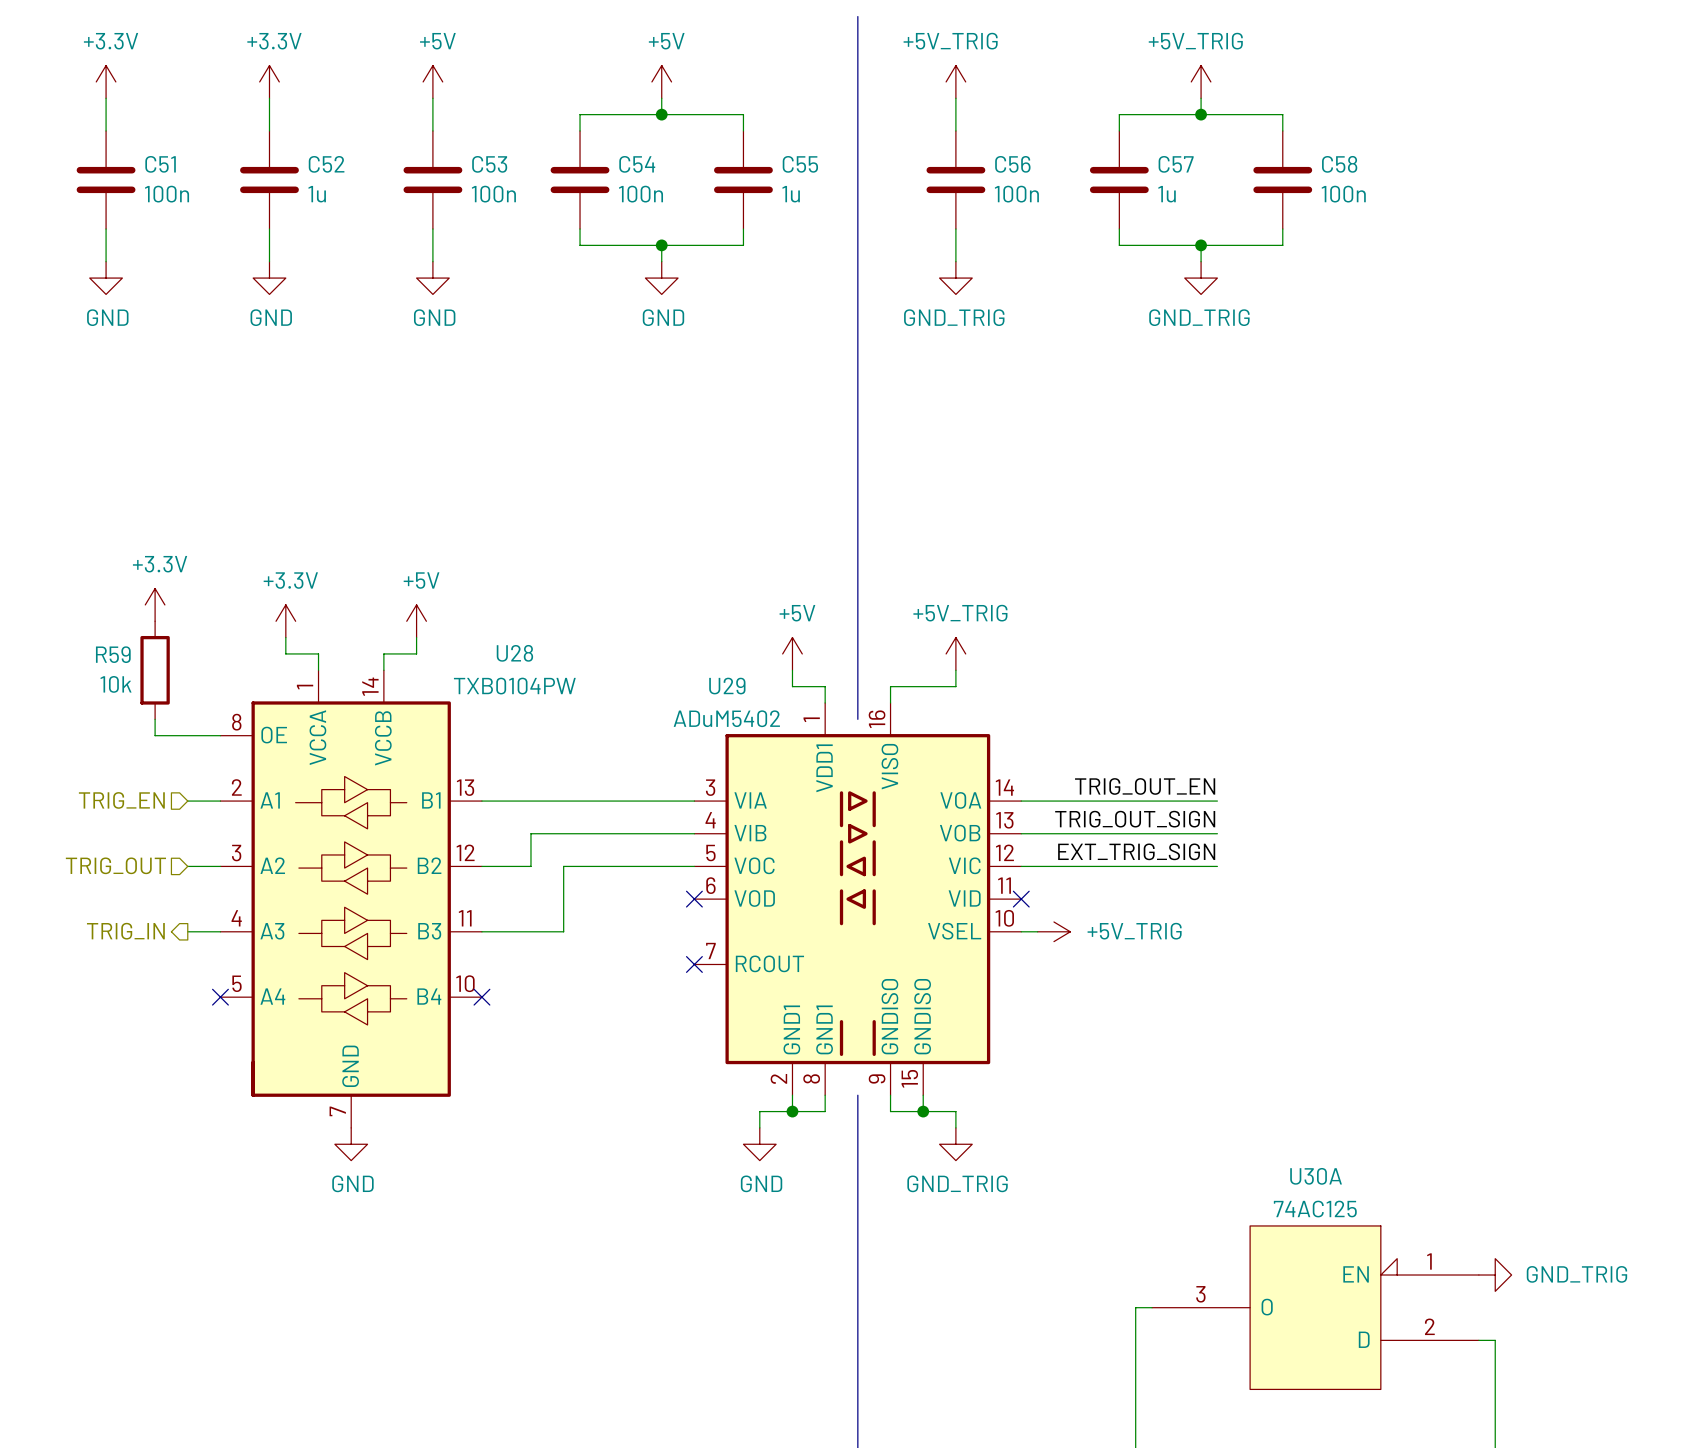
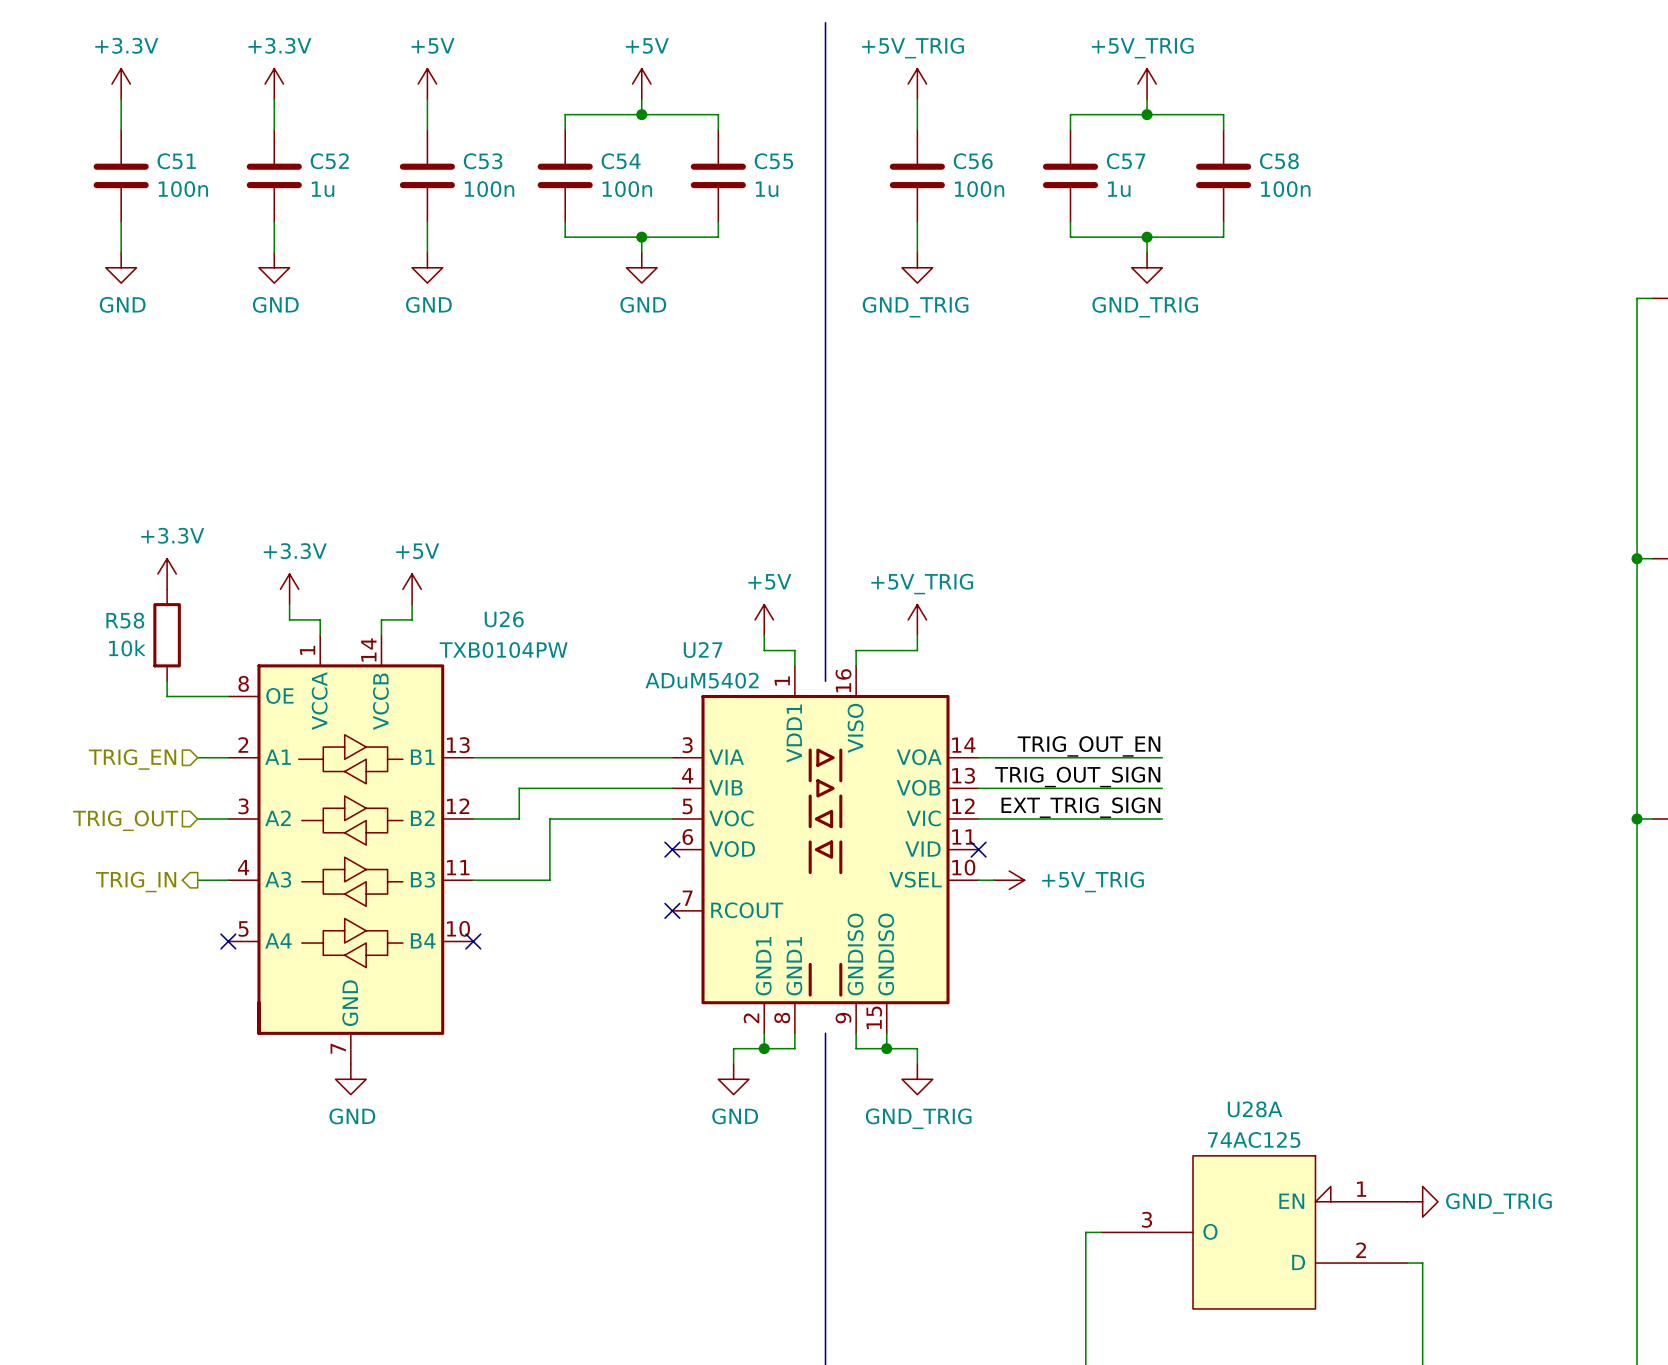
U28 name: U28 (514, 653) -> U26 (504, 619)
R59 name: R59 (113, 654) -> R58 (125, 620)
U29 name: U29 (727, 686) -> U27 (703, 650)
U30A name: U30A (1316, 1176) -> U28A (1255, 1109)

